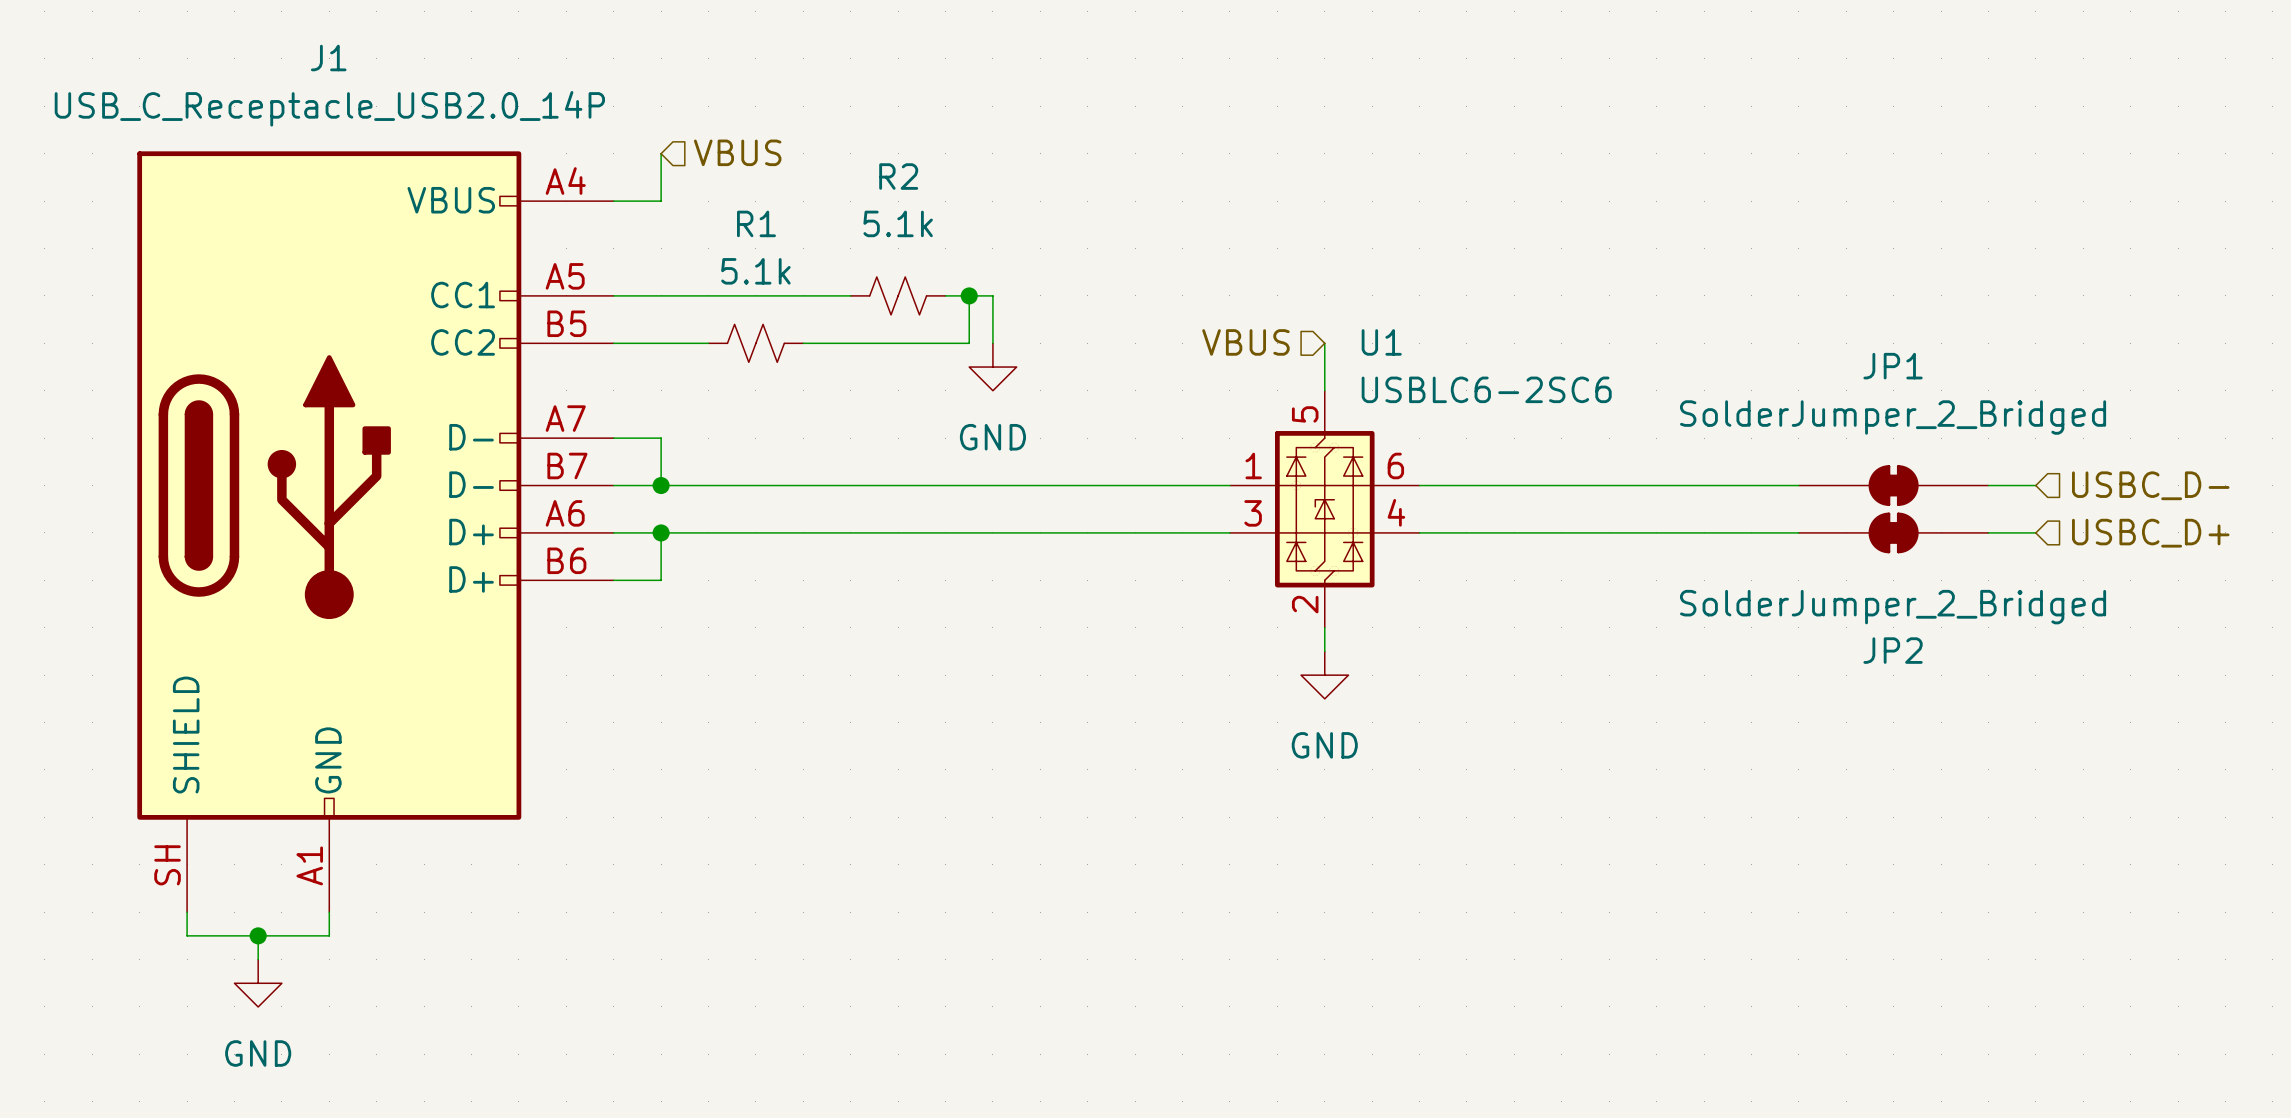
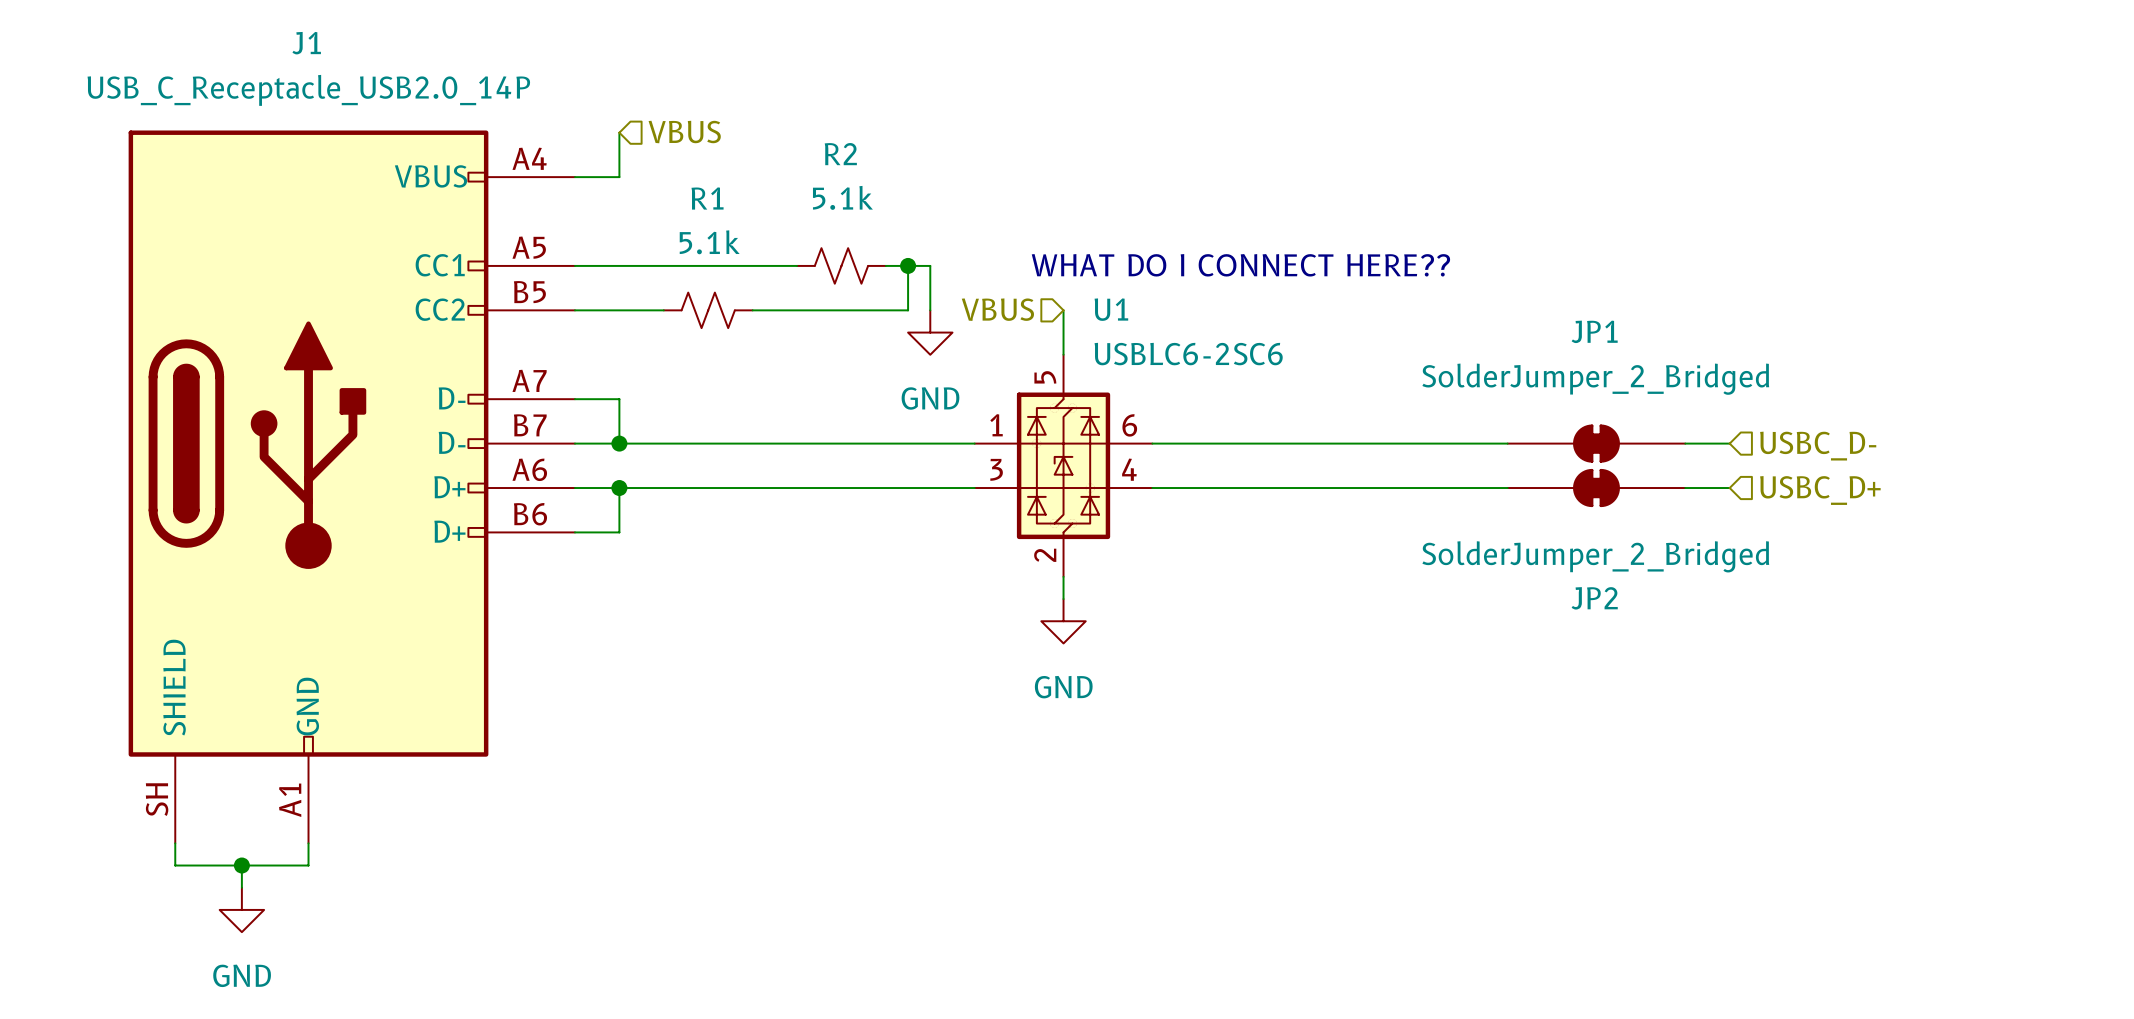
text: none -> WHAT DO I CONNECT HERE?? (1240, 265)
hierarchical label position: VBUS (1245, 342) -> VBUS (997, 309)
wire: (1324, 343) (1324, 390) -> (1063, 310) (1063, 354)
JP1 position: (1893, 485) -> (1596, 443)
wire: (1988, 485) (2035, 485) -> none
hierarchical label position: USBC_D- (2150, 485) -> USBC_D- (1818, 446)
U1 position: (1324, 509) -> (1063, 465)
JP2 position: (1893, 532) -> (1596, 488)
wire: (1988, 532) (2035, 532) -> none
hierarchical label position: USBC_D+ (2150, 533) -> USBC_D+ (1820, 490)
wire: (1324, 627) (1324, 651) -> (1063, 576) (1063, 599)
power symbol position: GND (1324, 675) -> GND (1063, 621)

